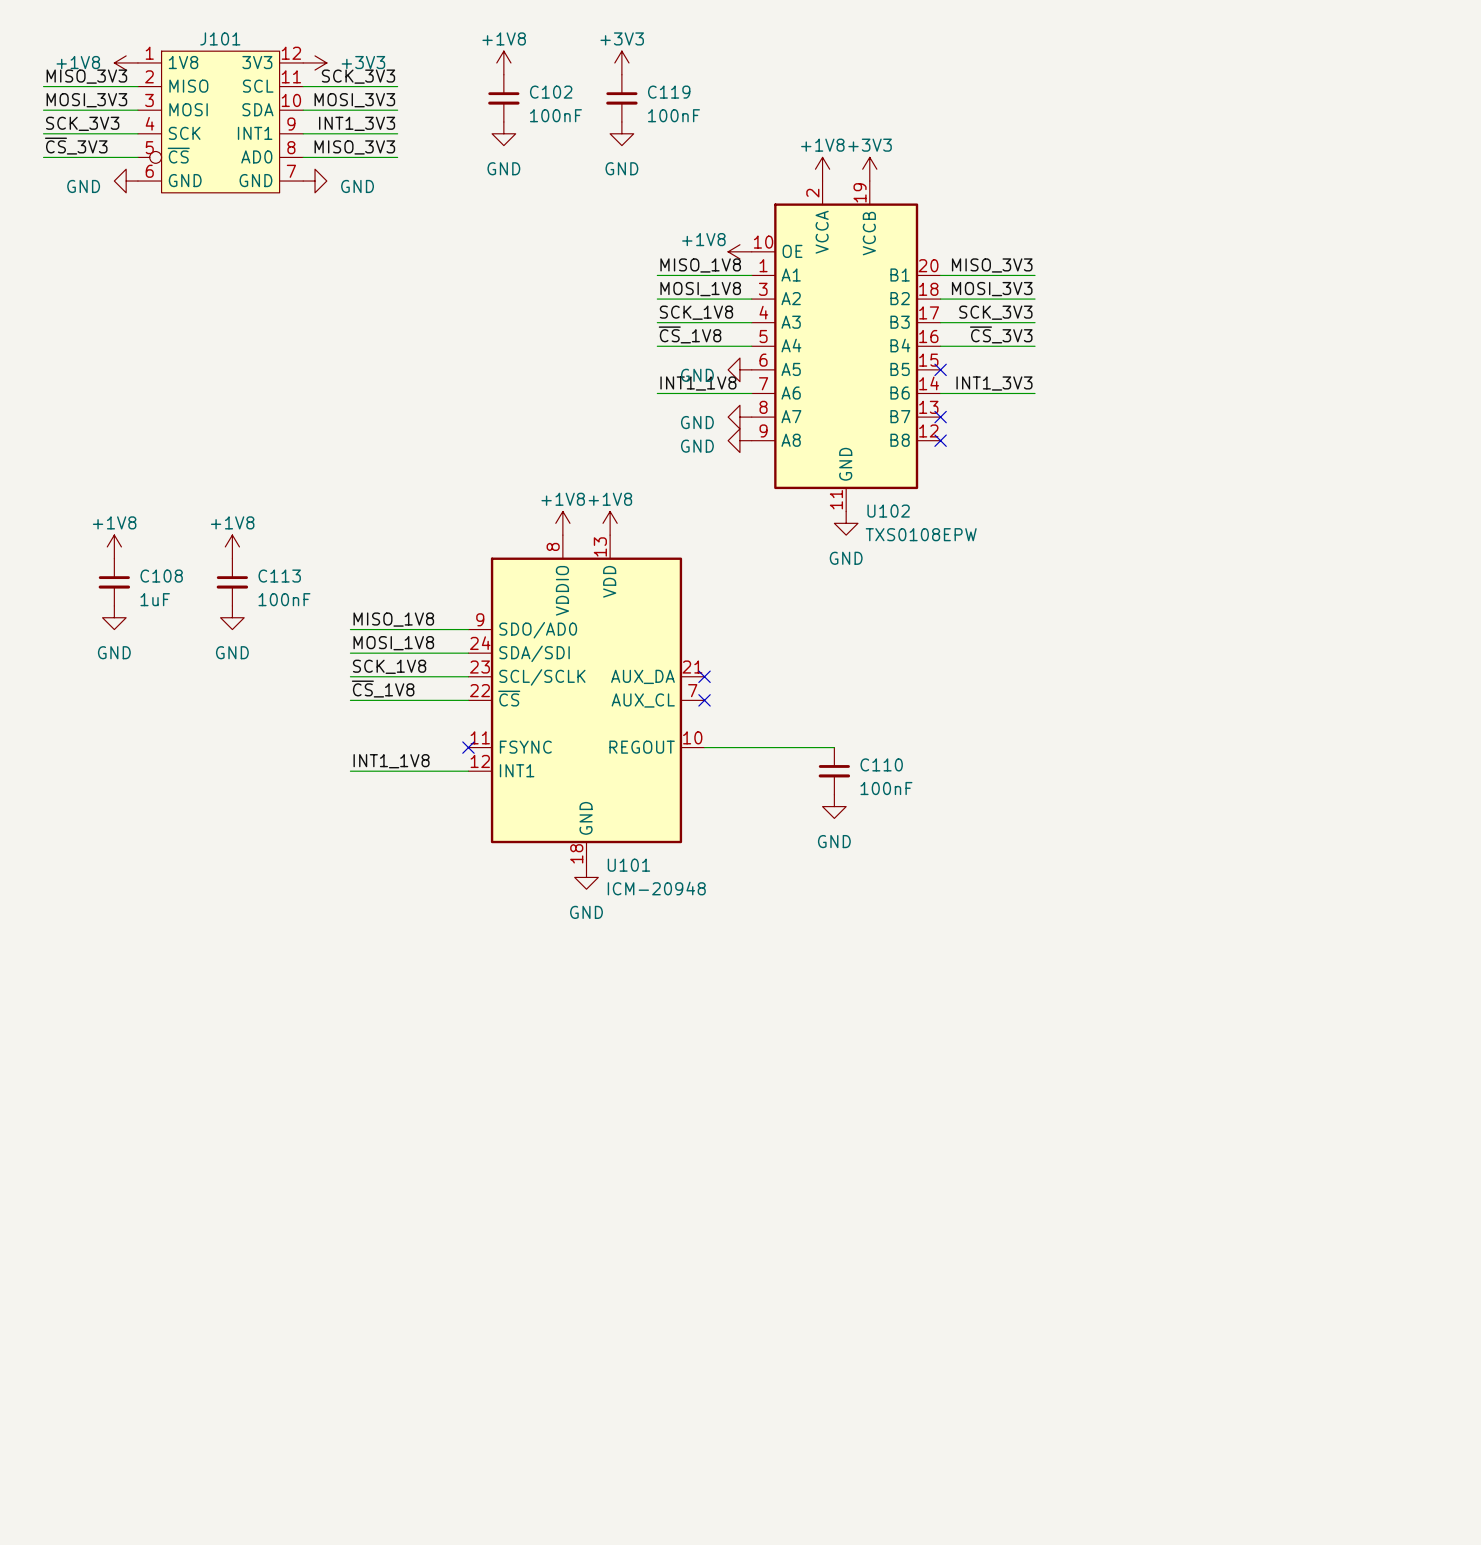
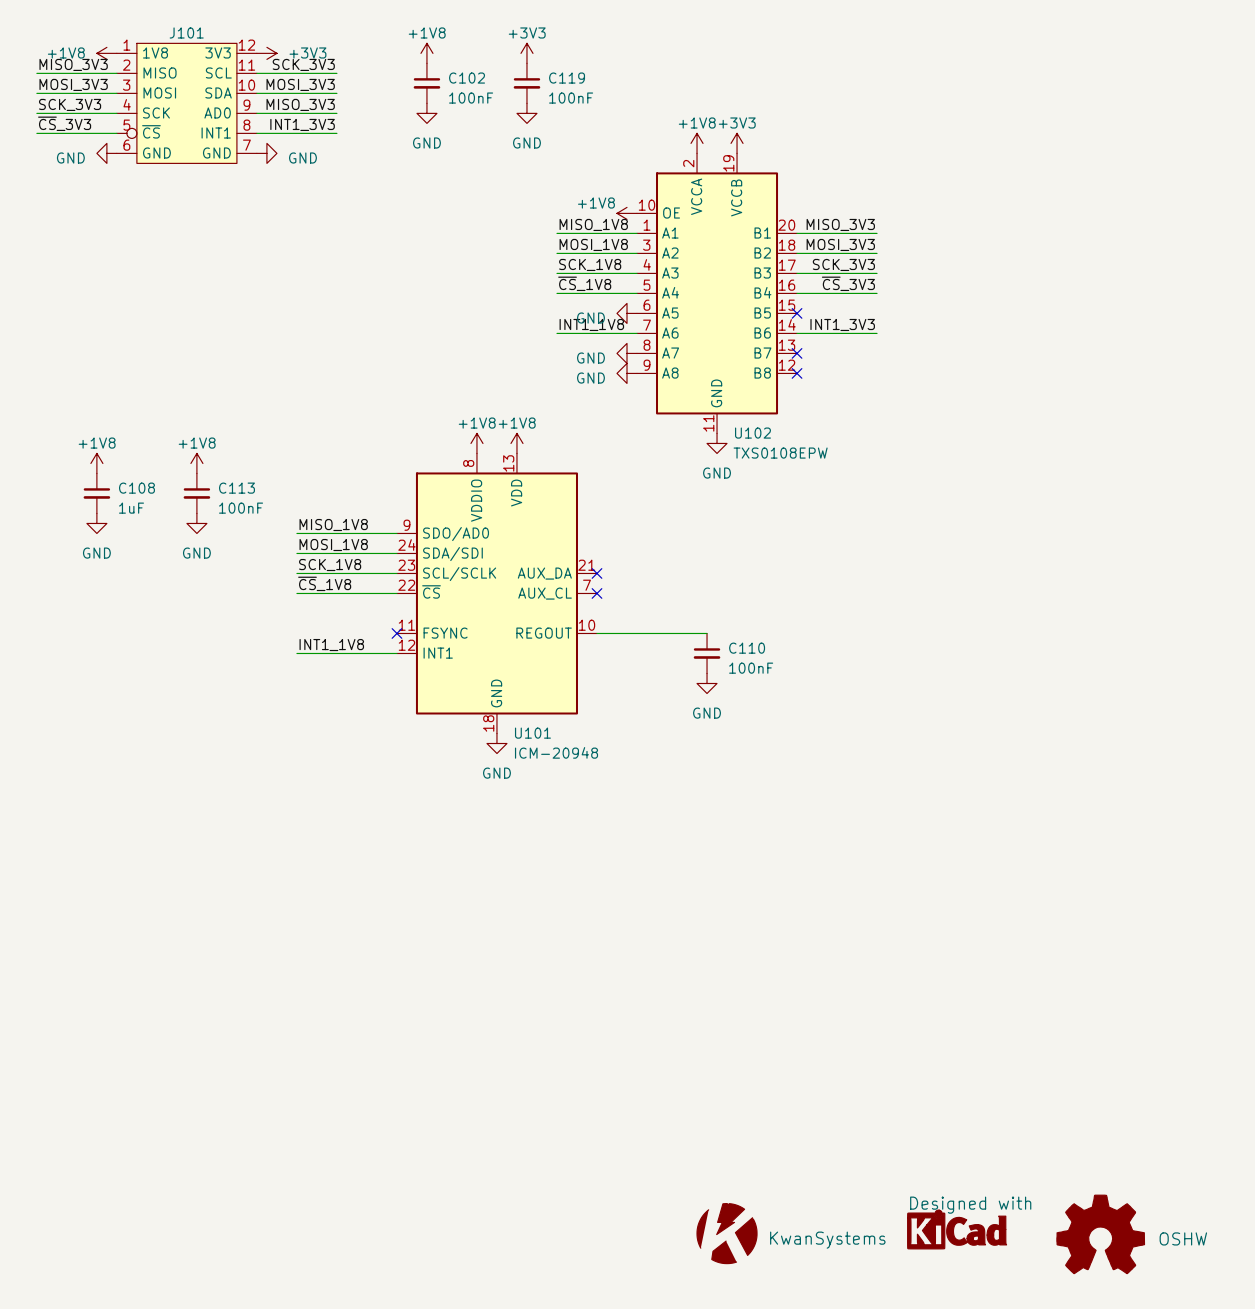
label: INT1_3V3 (357, 123) -> MISO_3V3 (300, 104)
J101 pin name: INT1 (255, 133) -> AD0 (217, 113)
label: MISO_3V3 (354, 147) -> INT1_3V3 (302, 124)
J101 pin name: AD0 (256, 156) -> INT1 (216, 133)
part: none -> Designed with (957, 1229)
part: none -> KwanSystems (727, 1233)
part: none -> OSHW (1100, 1234)

